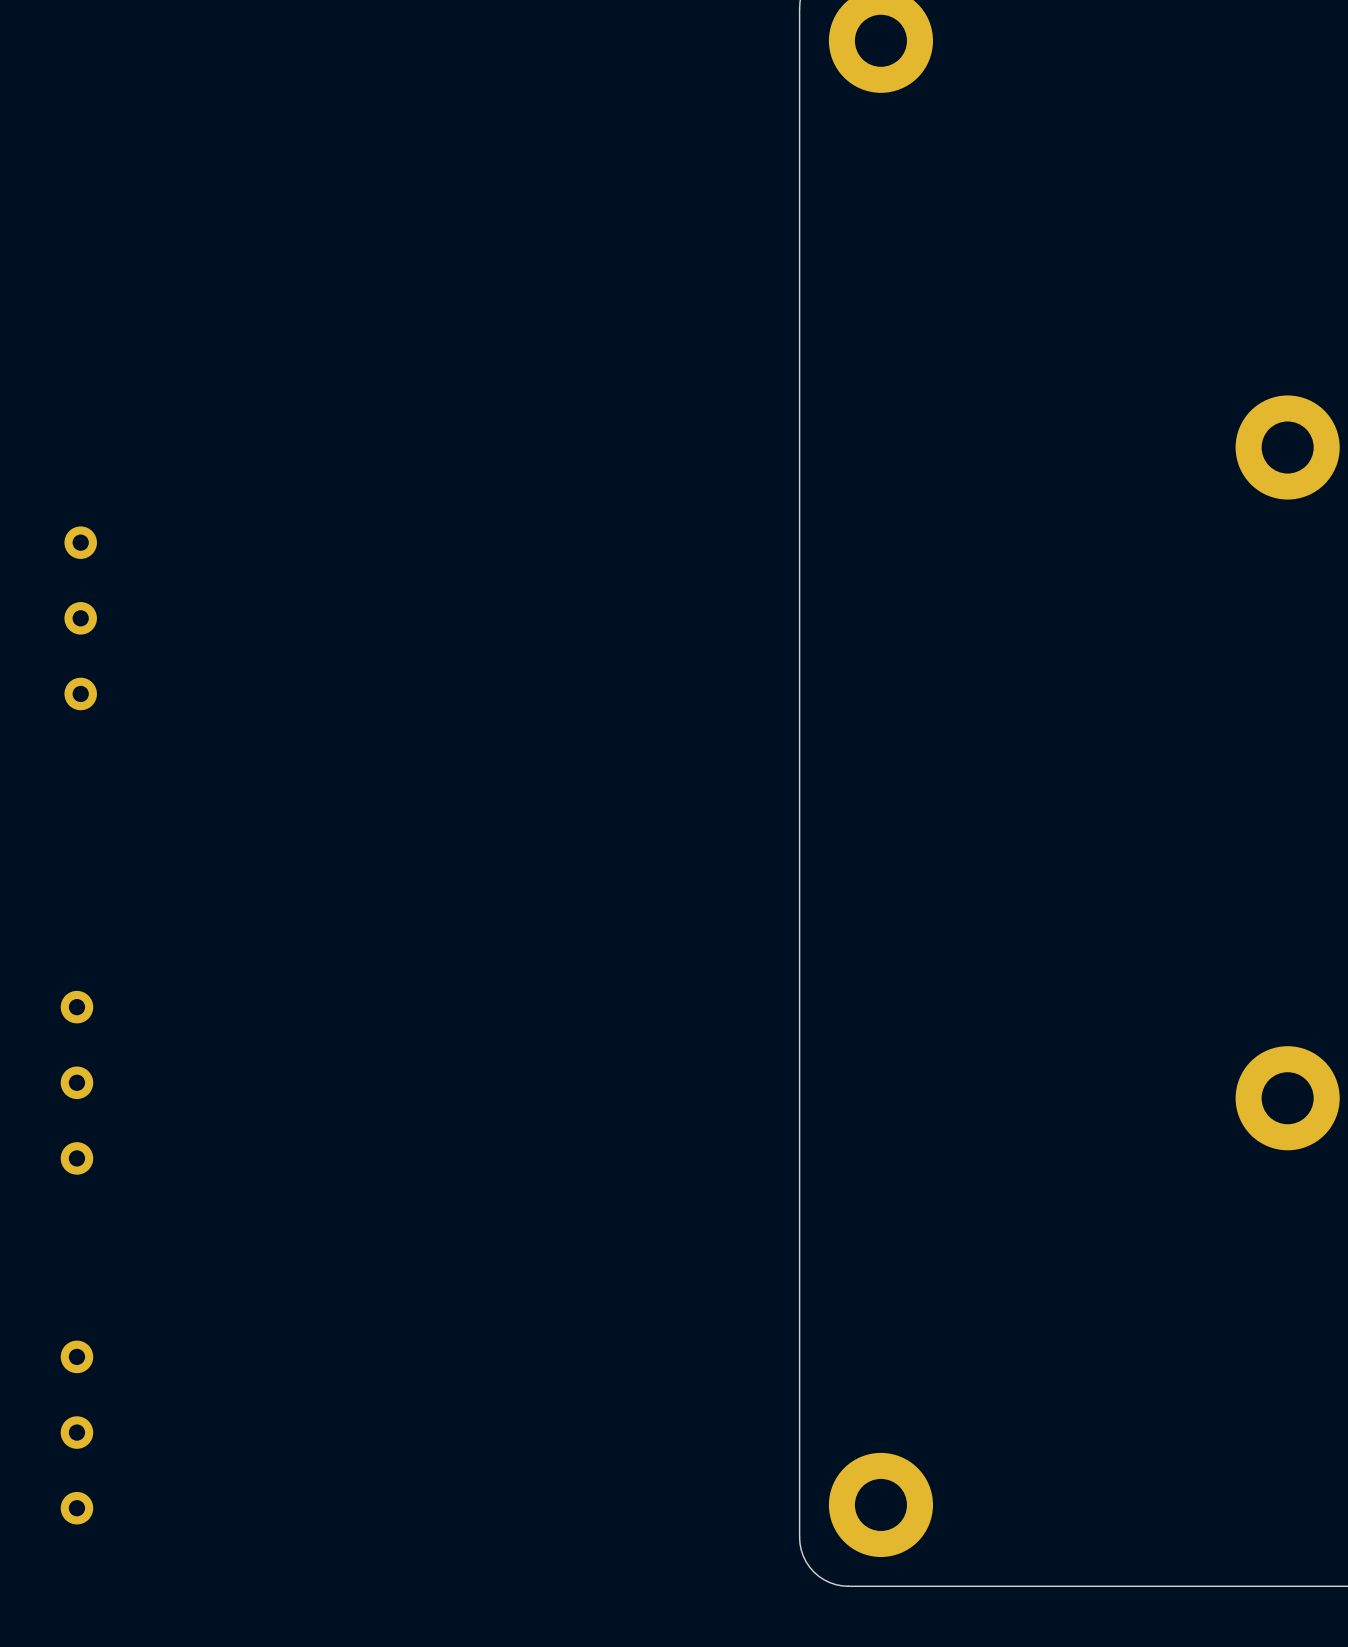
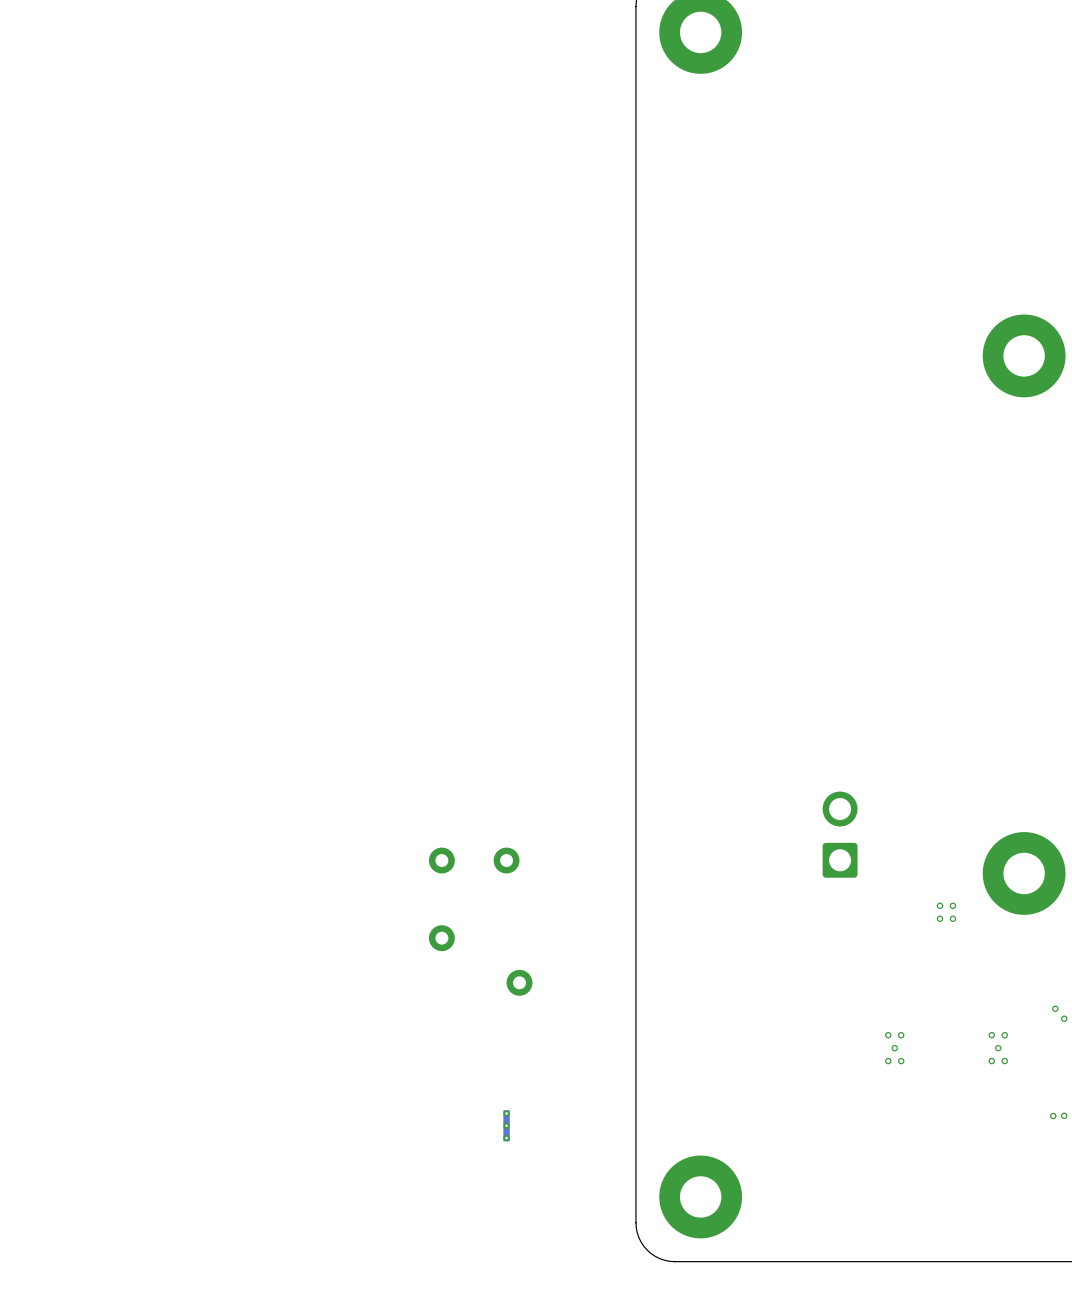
part: (80, 542) -> none
part: (80, 618) -> none
part: (80, 693) -> none
part: (76, 1007) -> none
part: none -> (840, 834)
part: none -> (441, 860)
part: none -> (506, 860)
part: (76, 1082) -> none
via: none -> (940, 905)
via: none -> (952, 905)
via: none -> (940, 918)
via: none -> (952, 918)
part: (76, 1158) -> none
part: none -> (441, 938)
part: none -> (519, 982)
via: none -> (1055, 1008)
via: none -> (1064, 1018)
via: none -> (888, 1035)
via: none -> (901, 1035)
via: none -> (991, 1035)
via: none -> (1004, 1035)
via: none -> (894, 1048)
via: none -> (998, 1048)
via: none -> (888, 1061)
via: none -> (901, 1061)
via: none -> (991, 1061)
via: none -> (1004, 1061)
part: (76, 1356) -> none
via: none -> (1064, 1115)
via: none -> (1053, 1116)
part: none -> (506, 1125)
part: (76, 1432) -> none
part: (76, 1508) -> none

